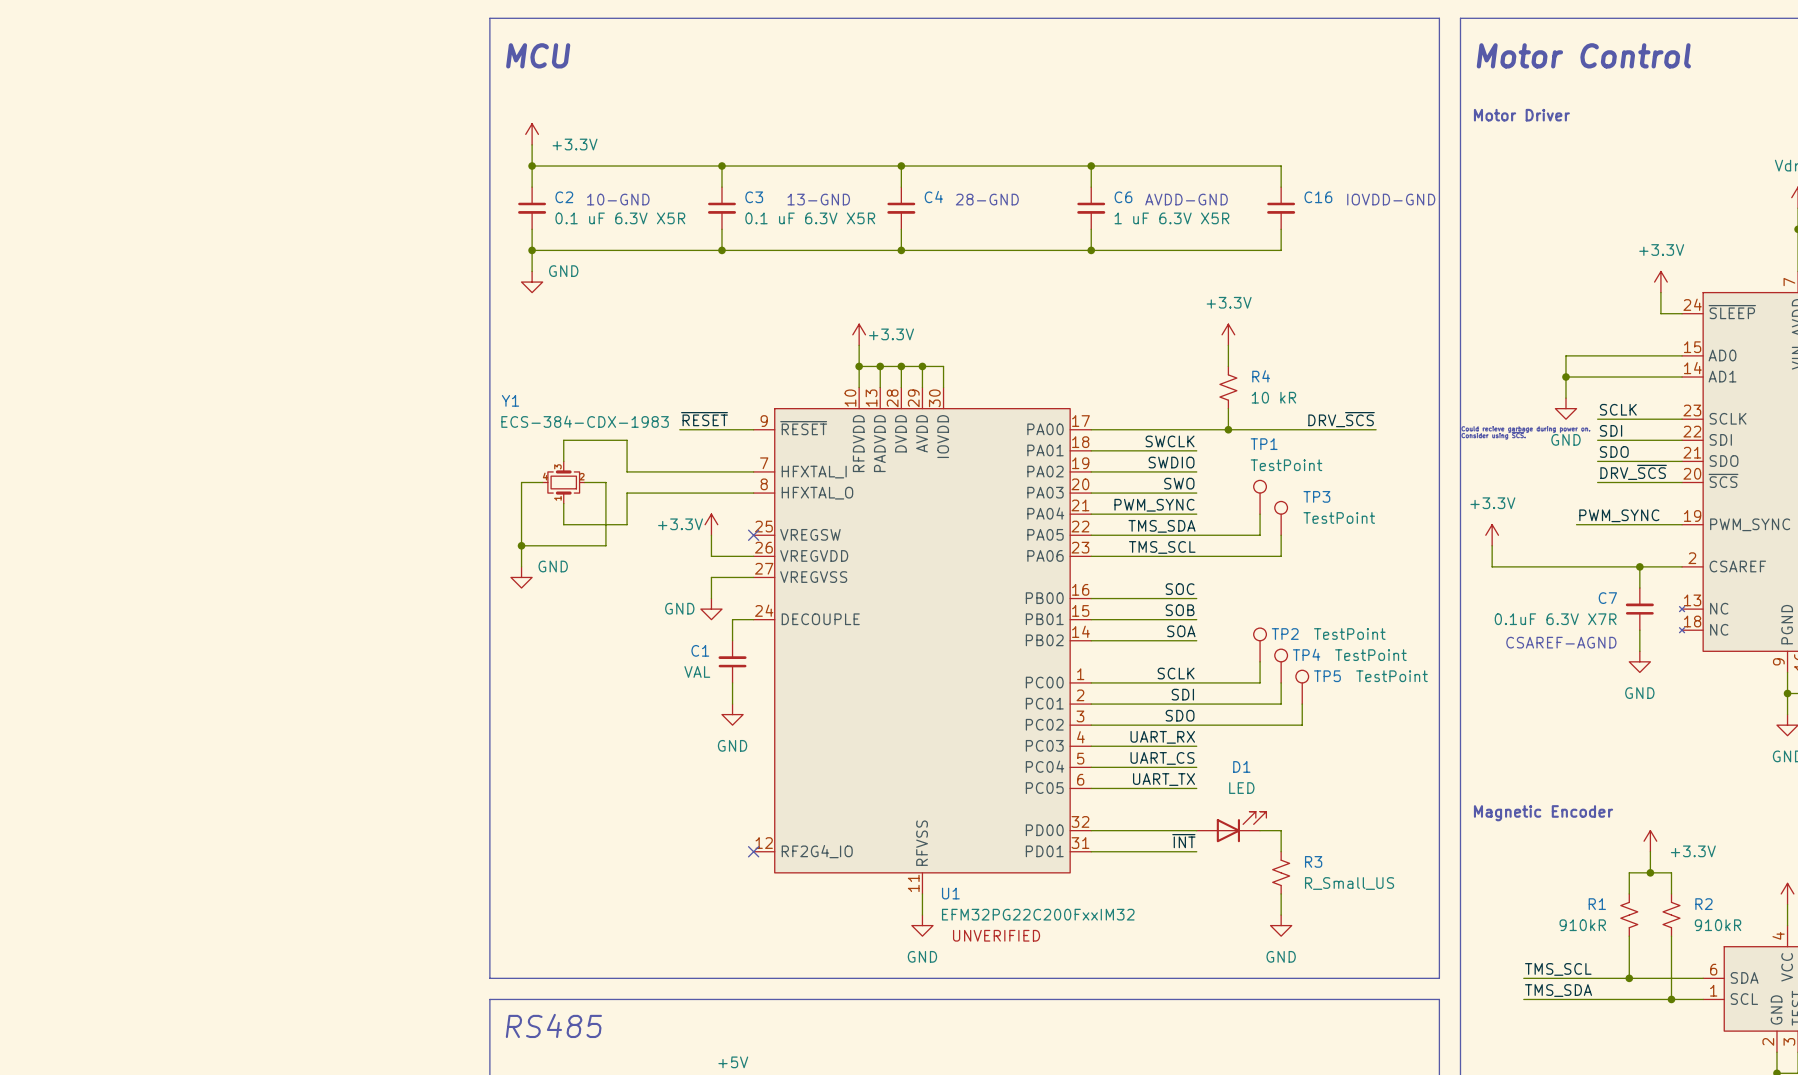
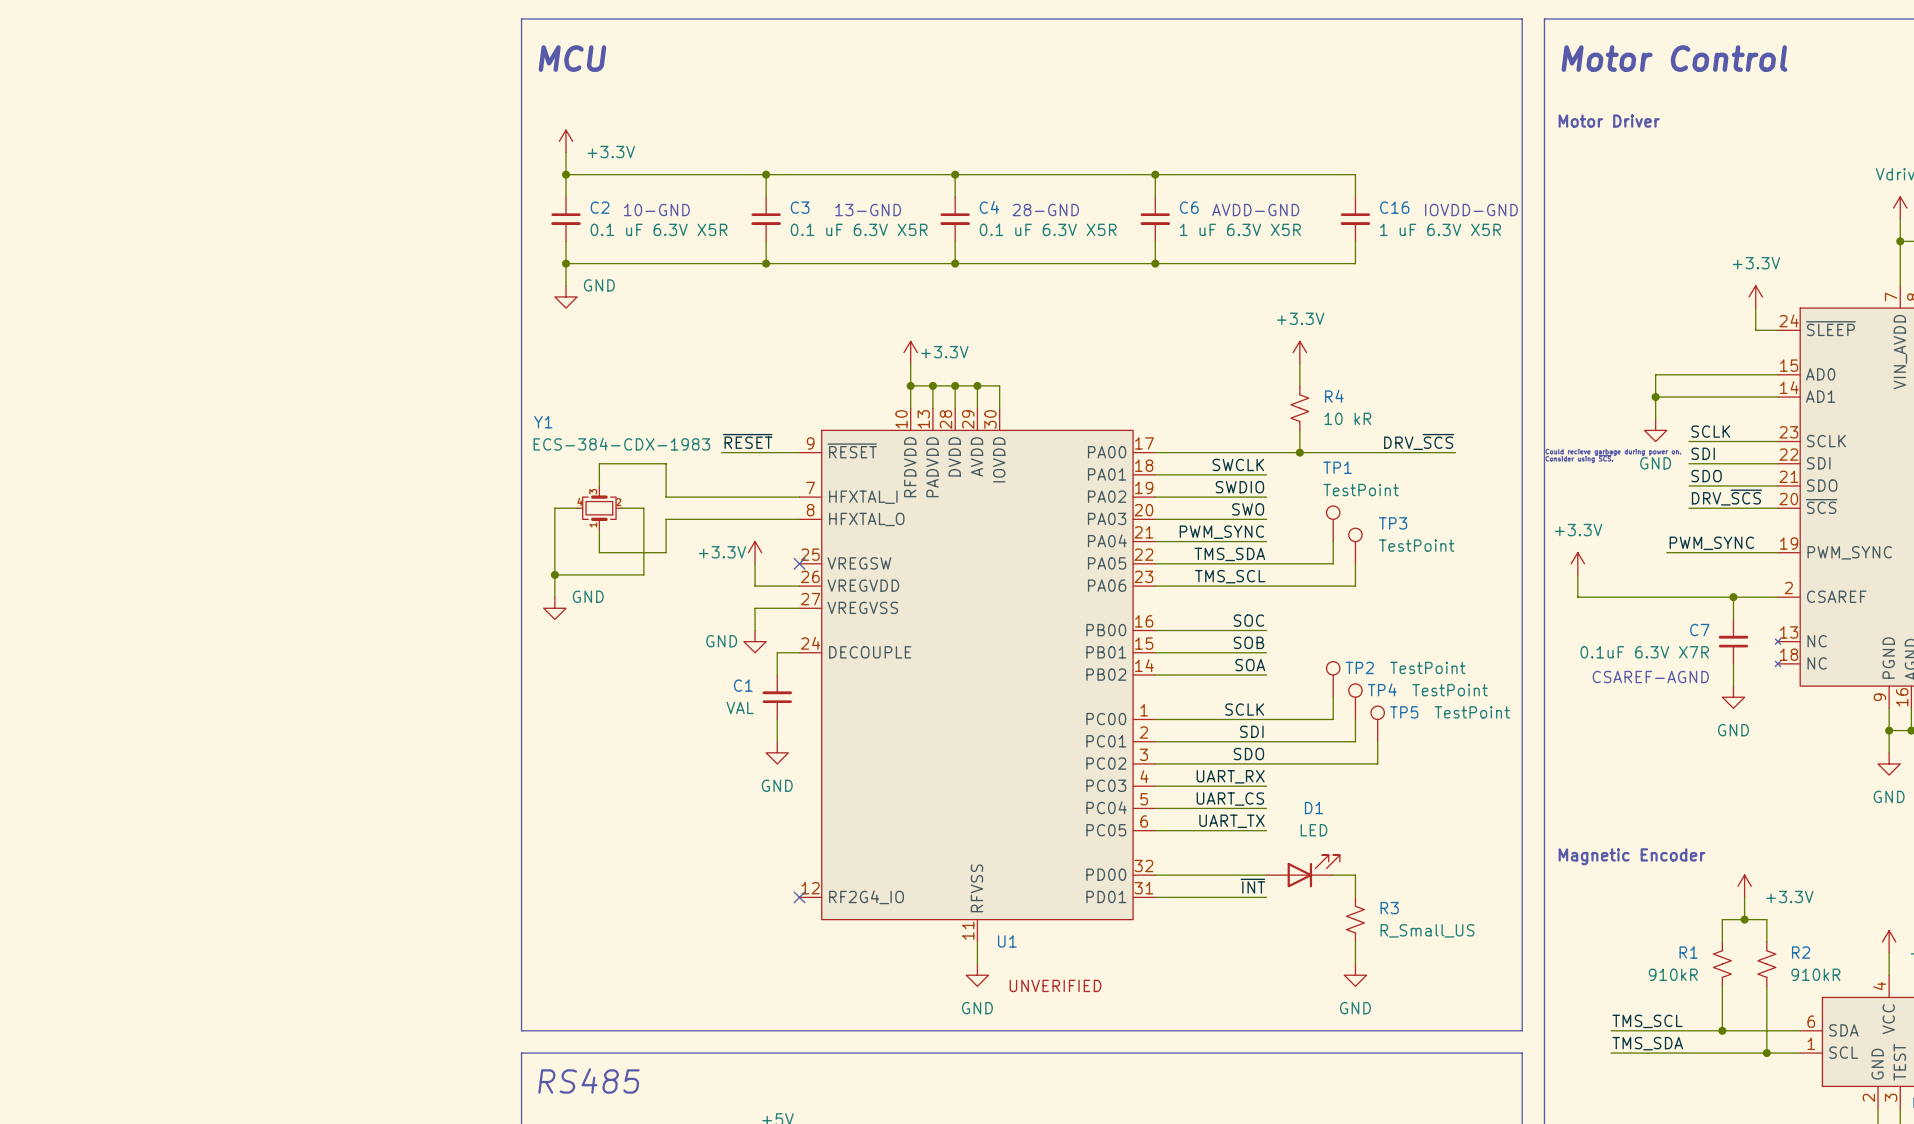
C4 value: none -> 0.1 uF 6.3V X5R (1048, 229)
C16 value: none -> 1 uF 6.3V X5R (1440, 229)
U1 value: EFM32PG22C200FxxIM32 (1038, 914) -> none

